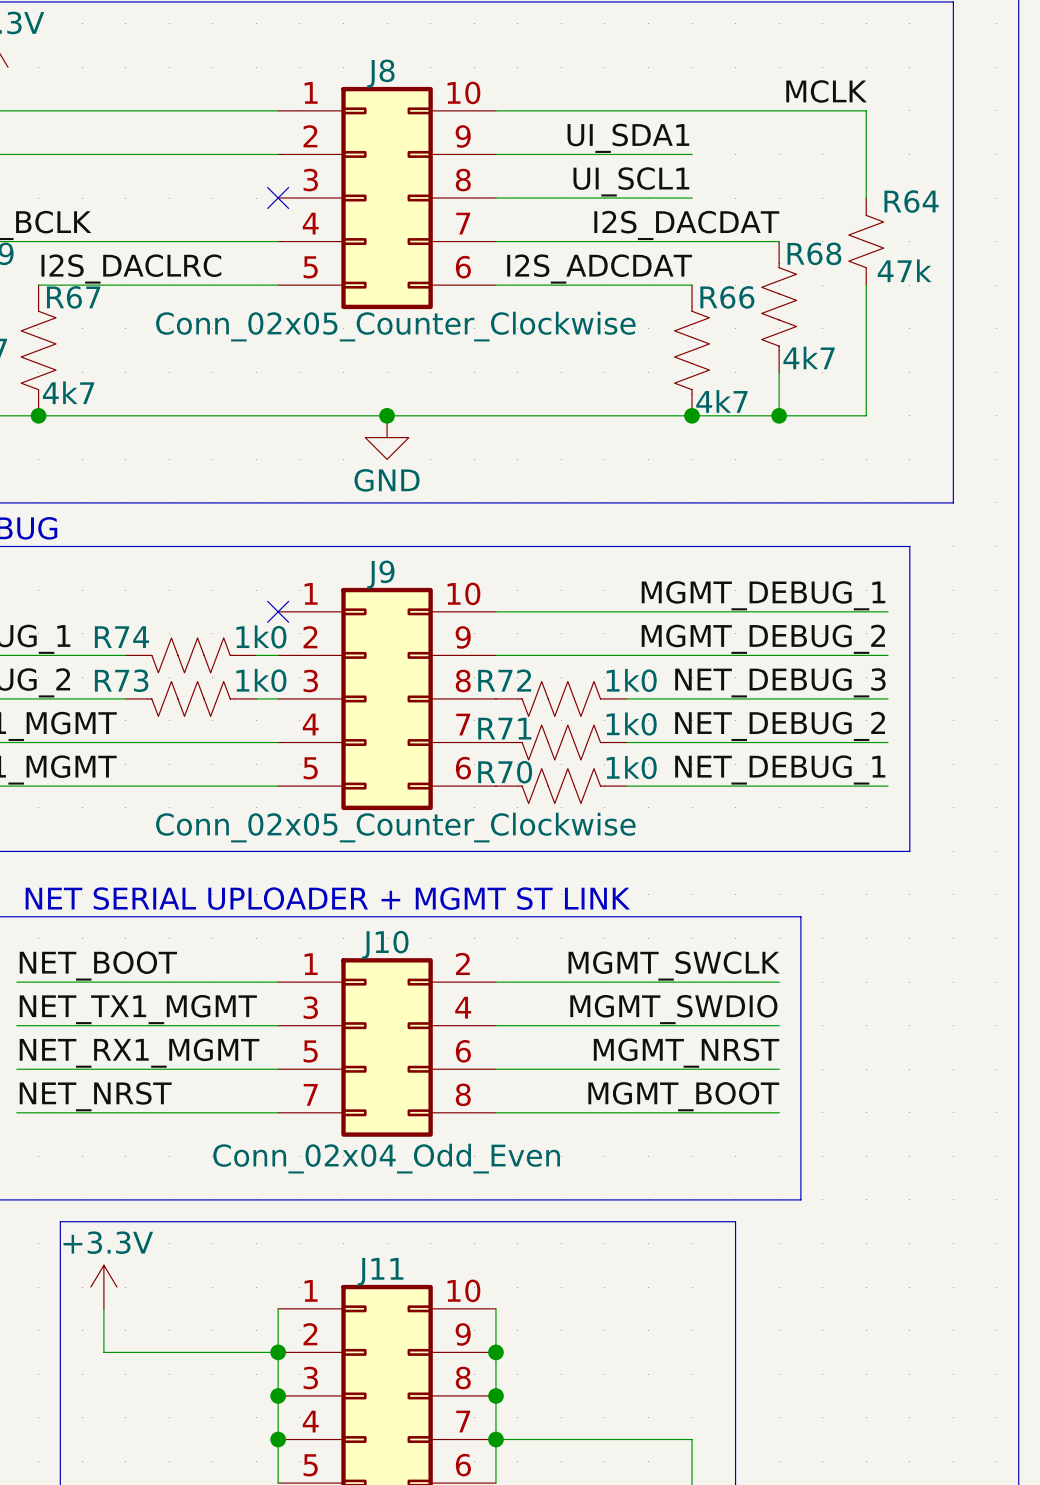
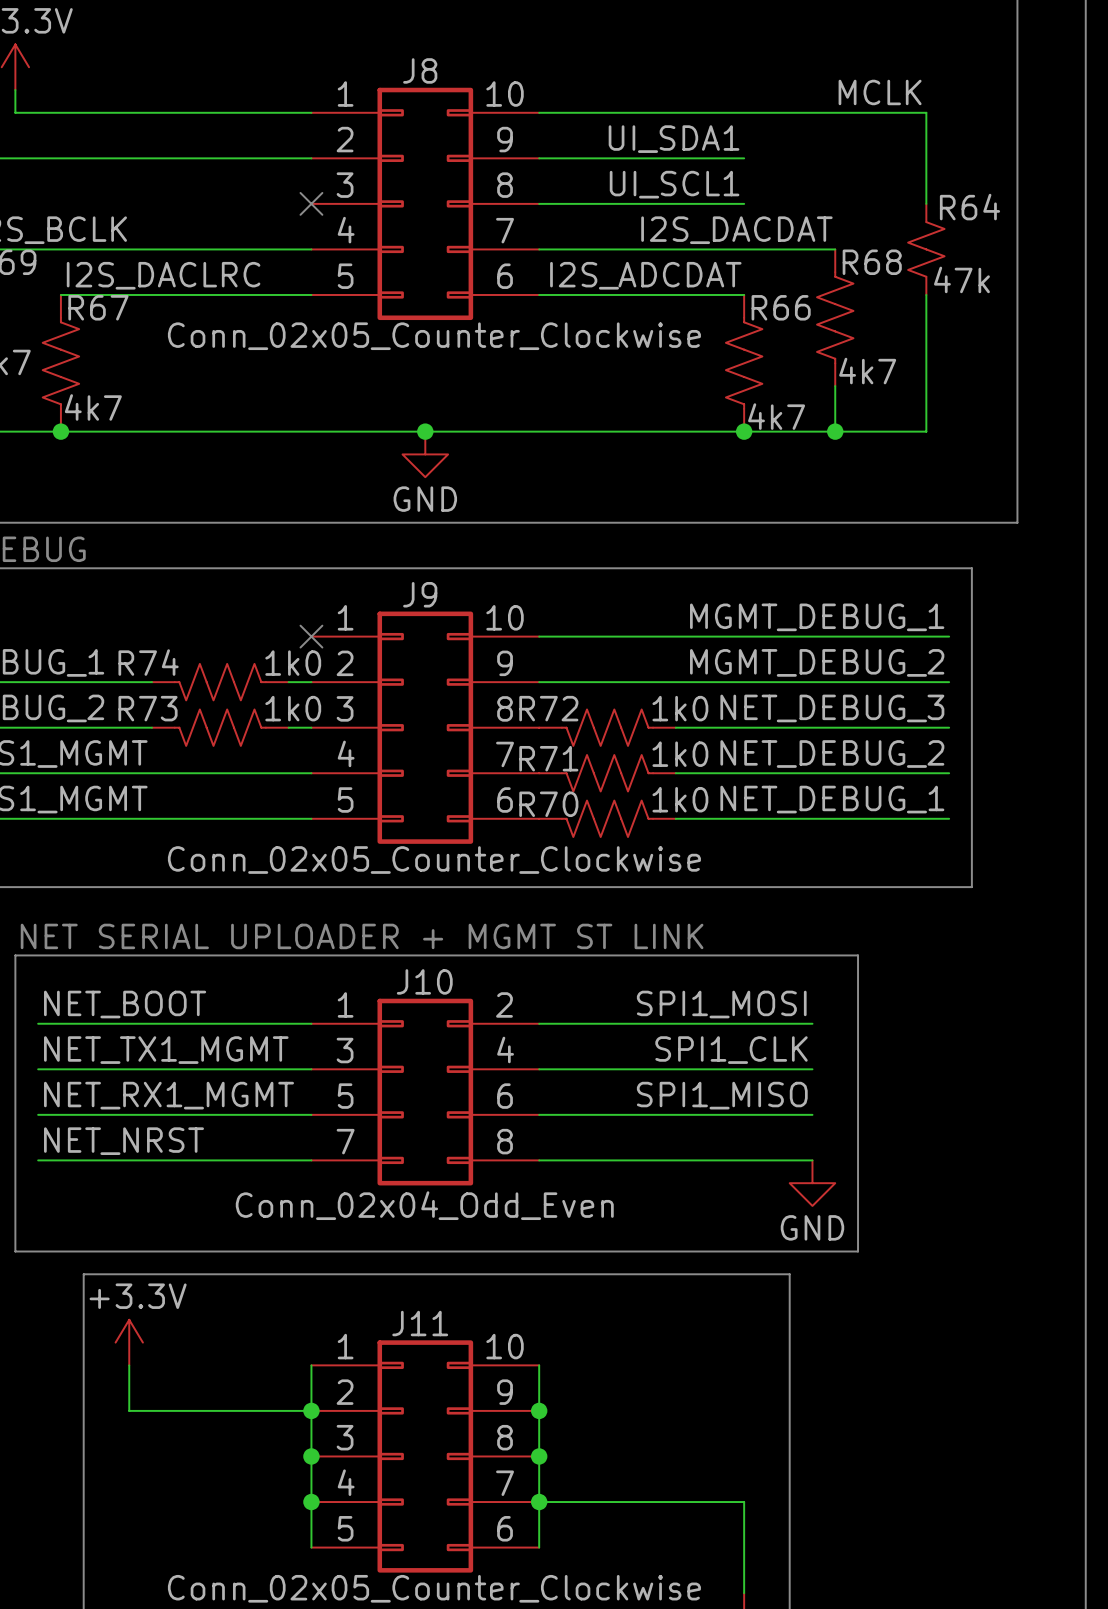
label: MGMT_SWCLK (674, 966) -> none
label: none -> SPI1_MOSI (721, 1004)
wire: (757, 982) (779, 982) -> none
label: MGMT_SWDIO (673, 1009) -> none
label: none -> SPI1_CLK (731, 1050)
wire: (757, 1025) (779, 1025) -> none
label: none -> SPI1_MISO (722, 1095)
label: MGMT_NRST (686, 1053) -> none
wire: (757, 1069) (779, 1069) -> none
label: MGMT_BOOT (683, 1096) -> none
wire: (757, 1112) (779, 1112) -> none
power symbol: none -> GND (812, 1183)

